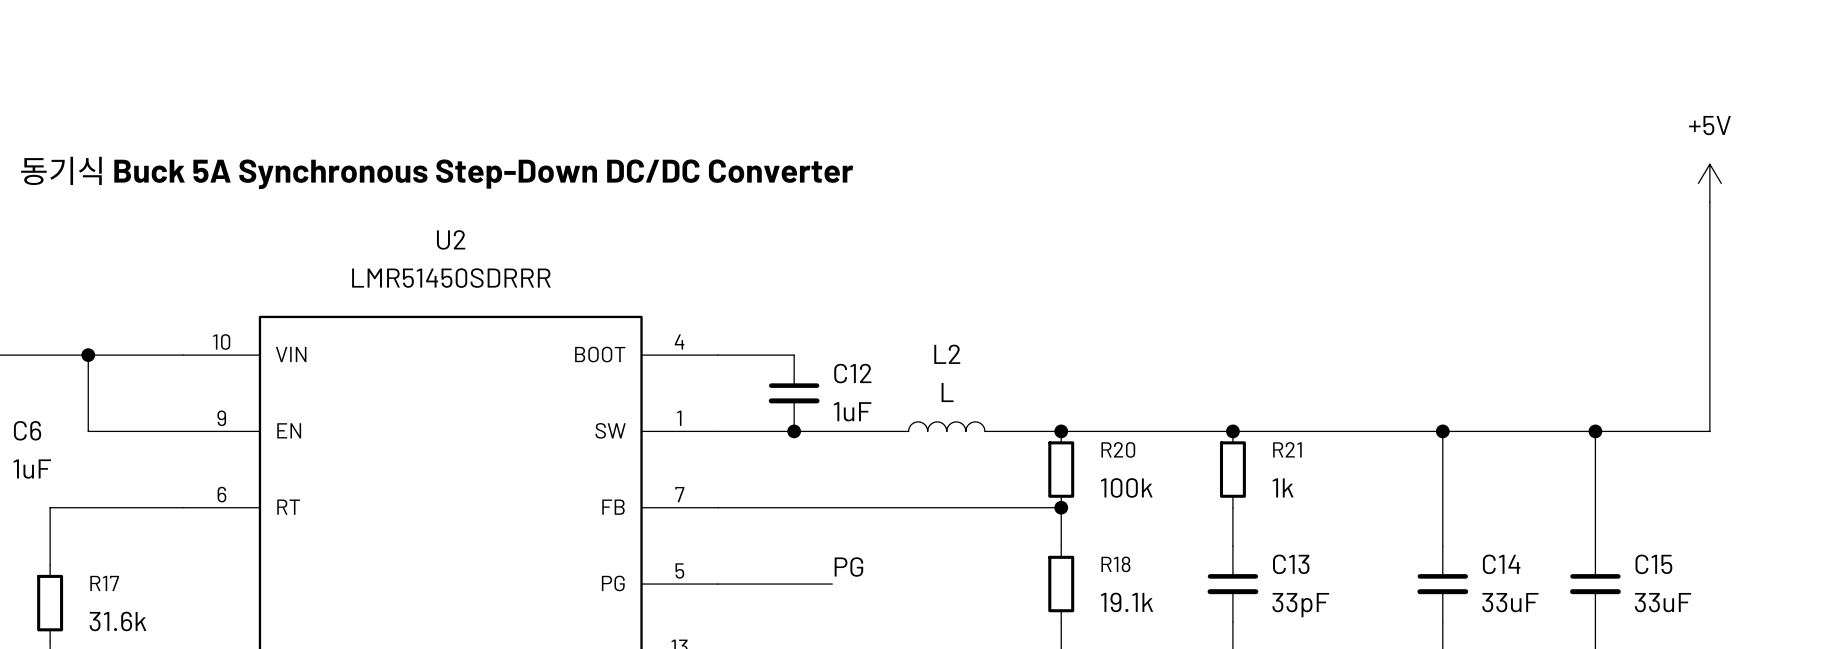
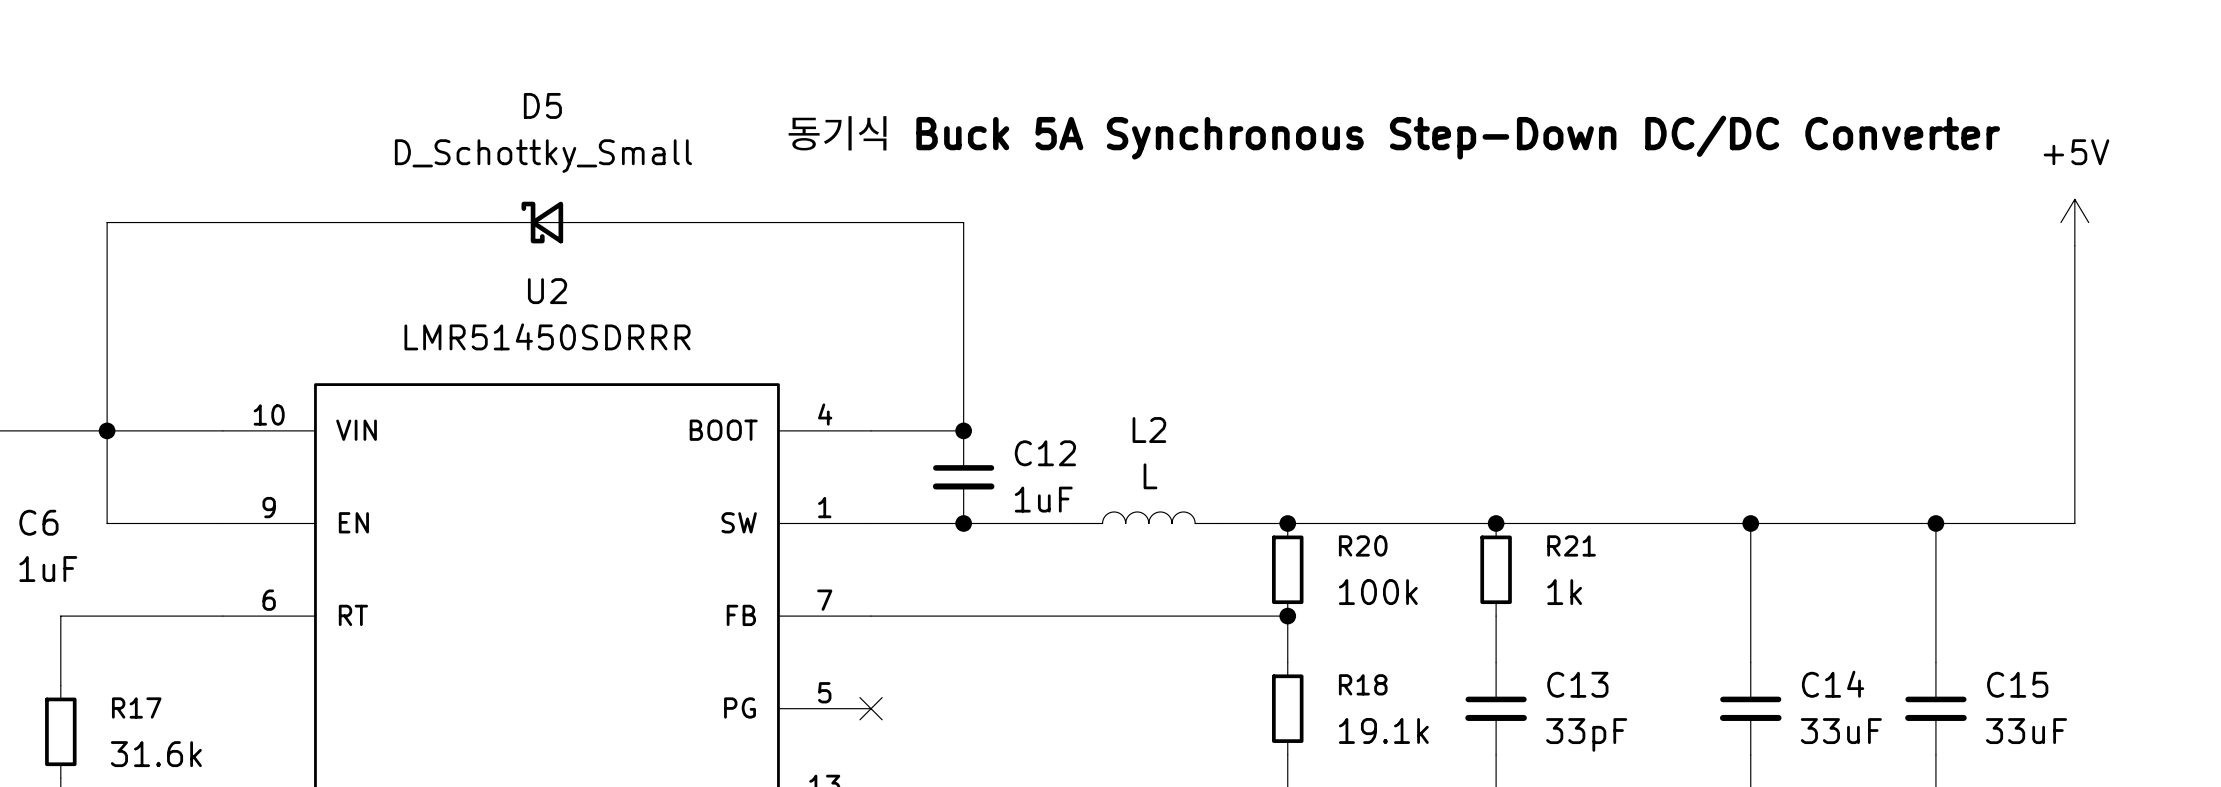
text: none -> 동기식 Buck 5A Synchronous Step-Down DC/DC Converter (1392, 136)
text: 동기식 Buck 5A Synchronous Step-Down DC/DC Converter (437, 172) -> none
wire: none -> (500, 222) (107, 222) (107, 430)
D5: none -> D_Schottky_Small (546, 222)
wire: none -> (593, 222) (963, 222) (963, 430)
junction: none -> (963, 430)
label: PG (848, 567) -> none
wire: (717, 584) (832, 584) -> none
no-connect mark: none -> (871, 708)

